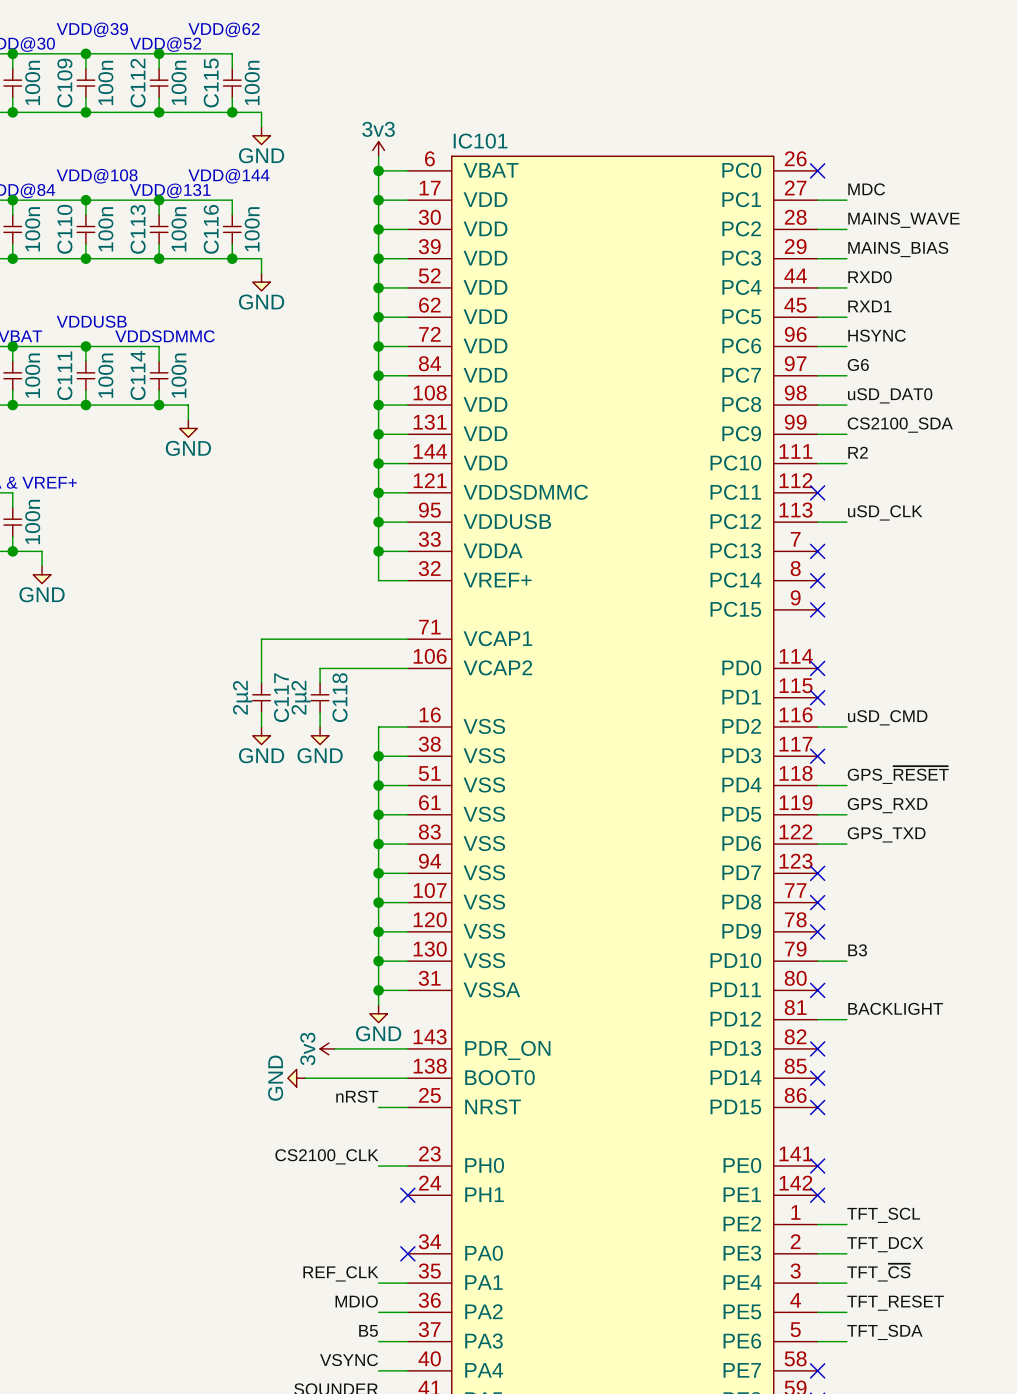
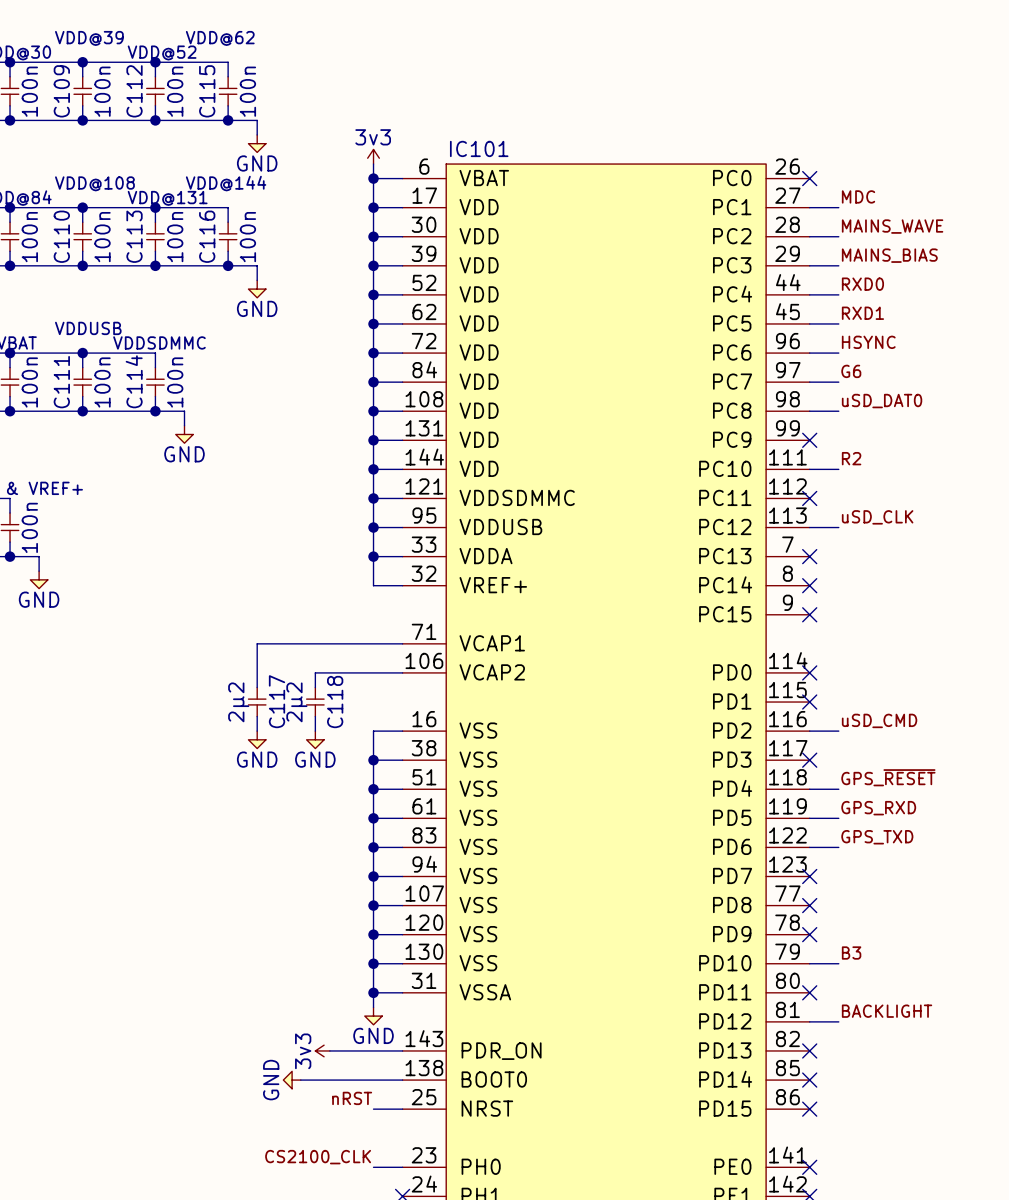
label: CS2100_SDA (900, 425) -> none
wire: (817, 434) (846, 434) -> none
no-connect mark: none -> (809, 440)

